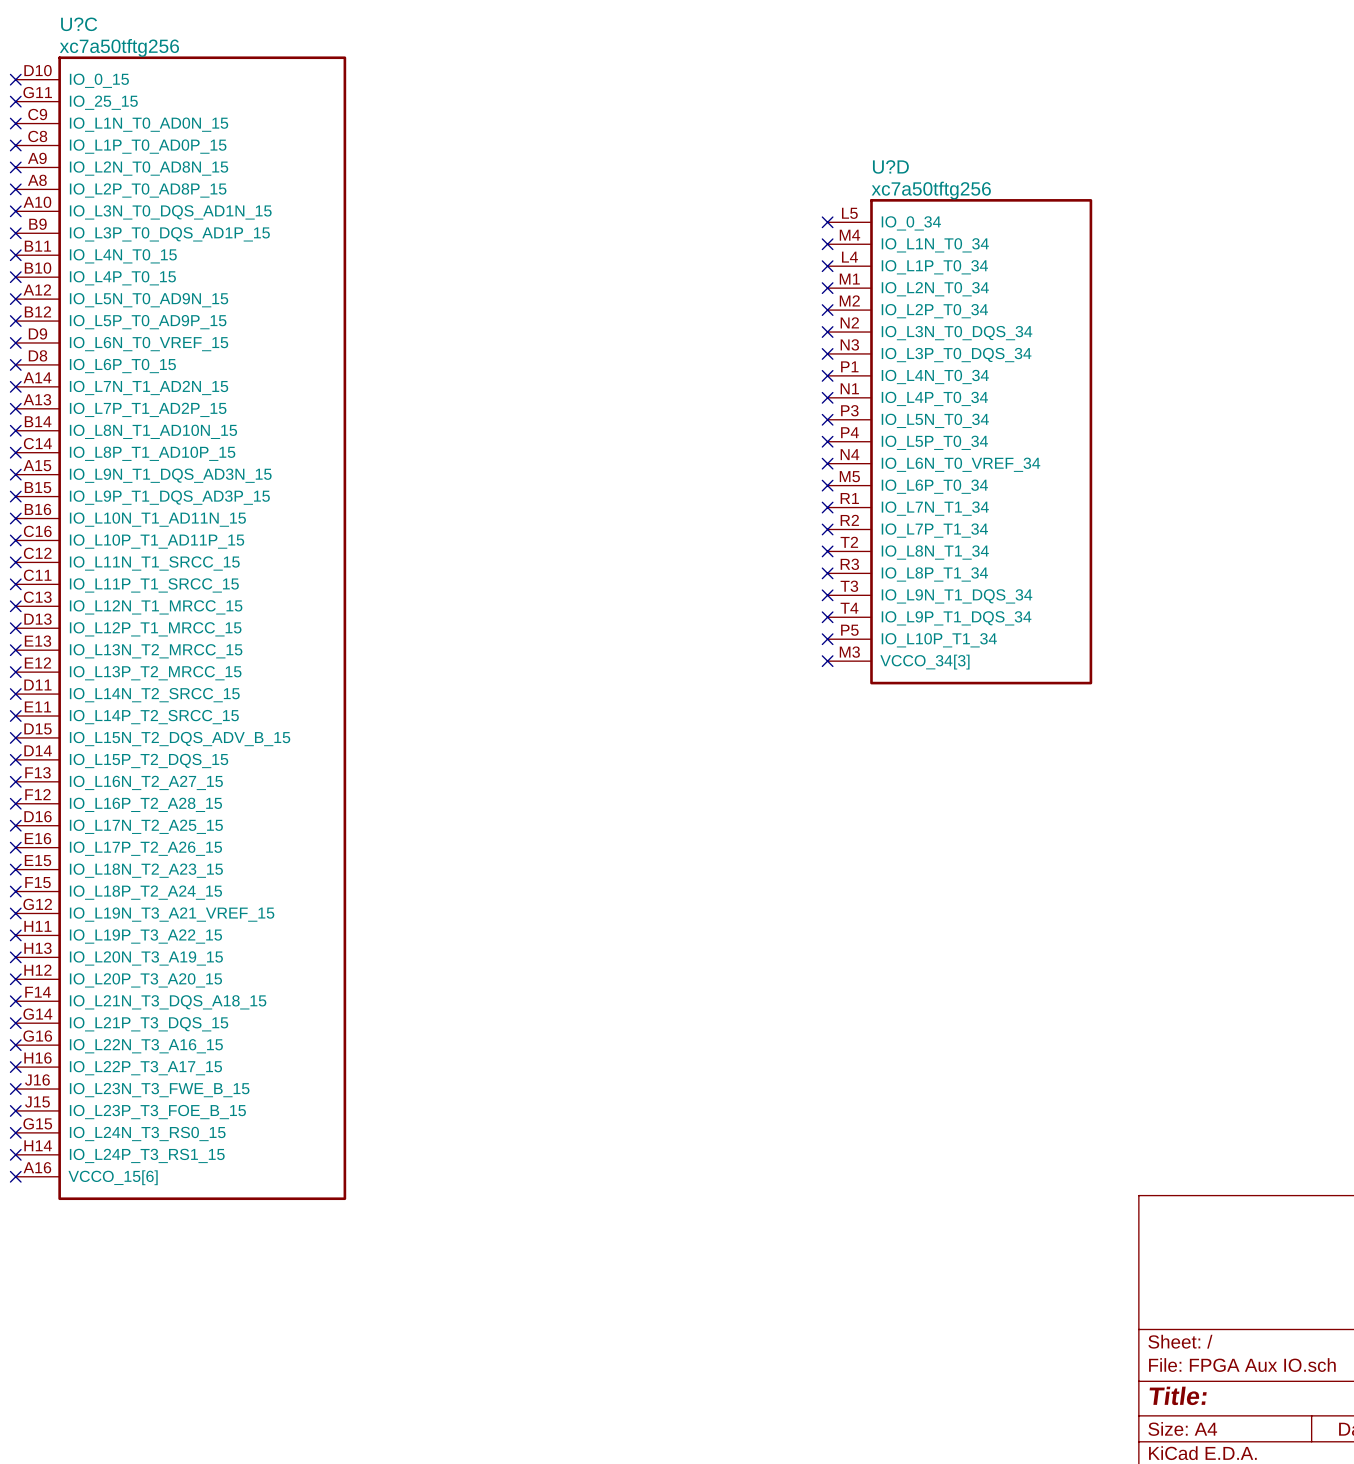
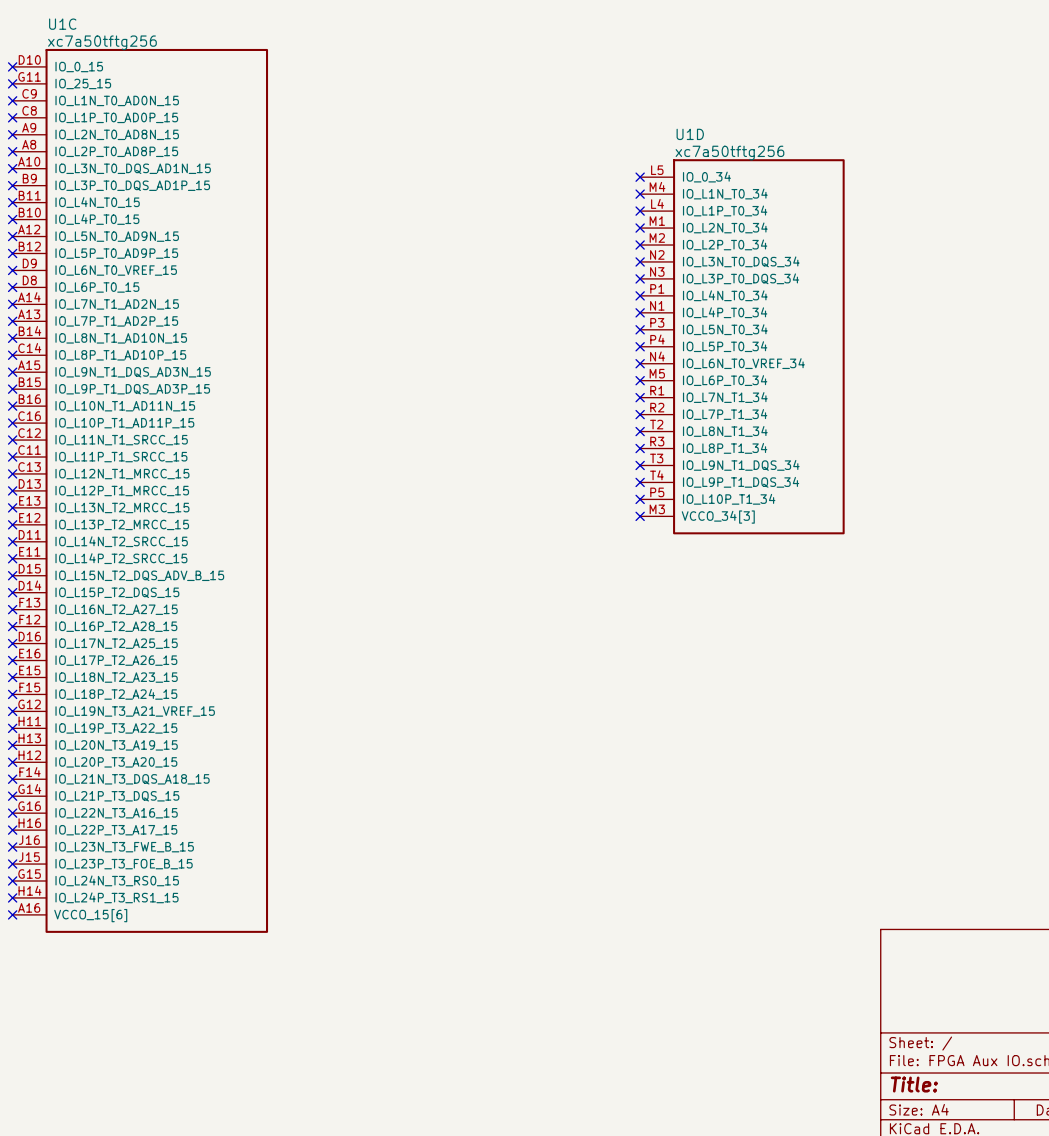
U?C name: U?C (79, 24) -> U1C (62, 24)
U?D name: U?D (890, 166) -> U1D (690, 134)

